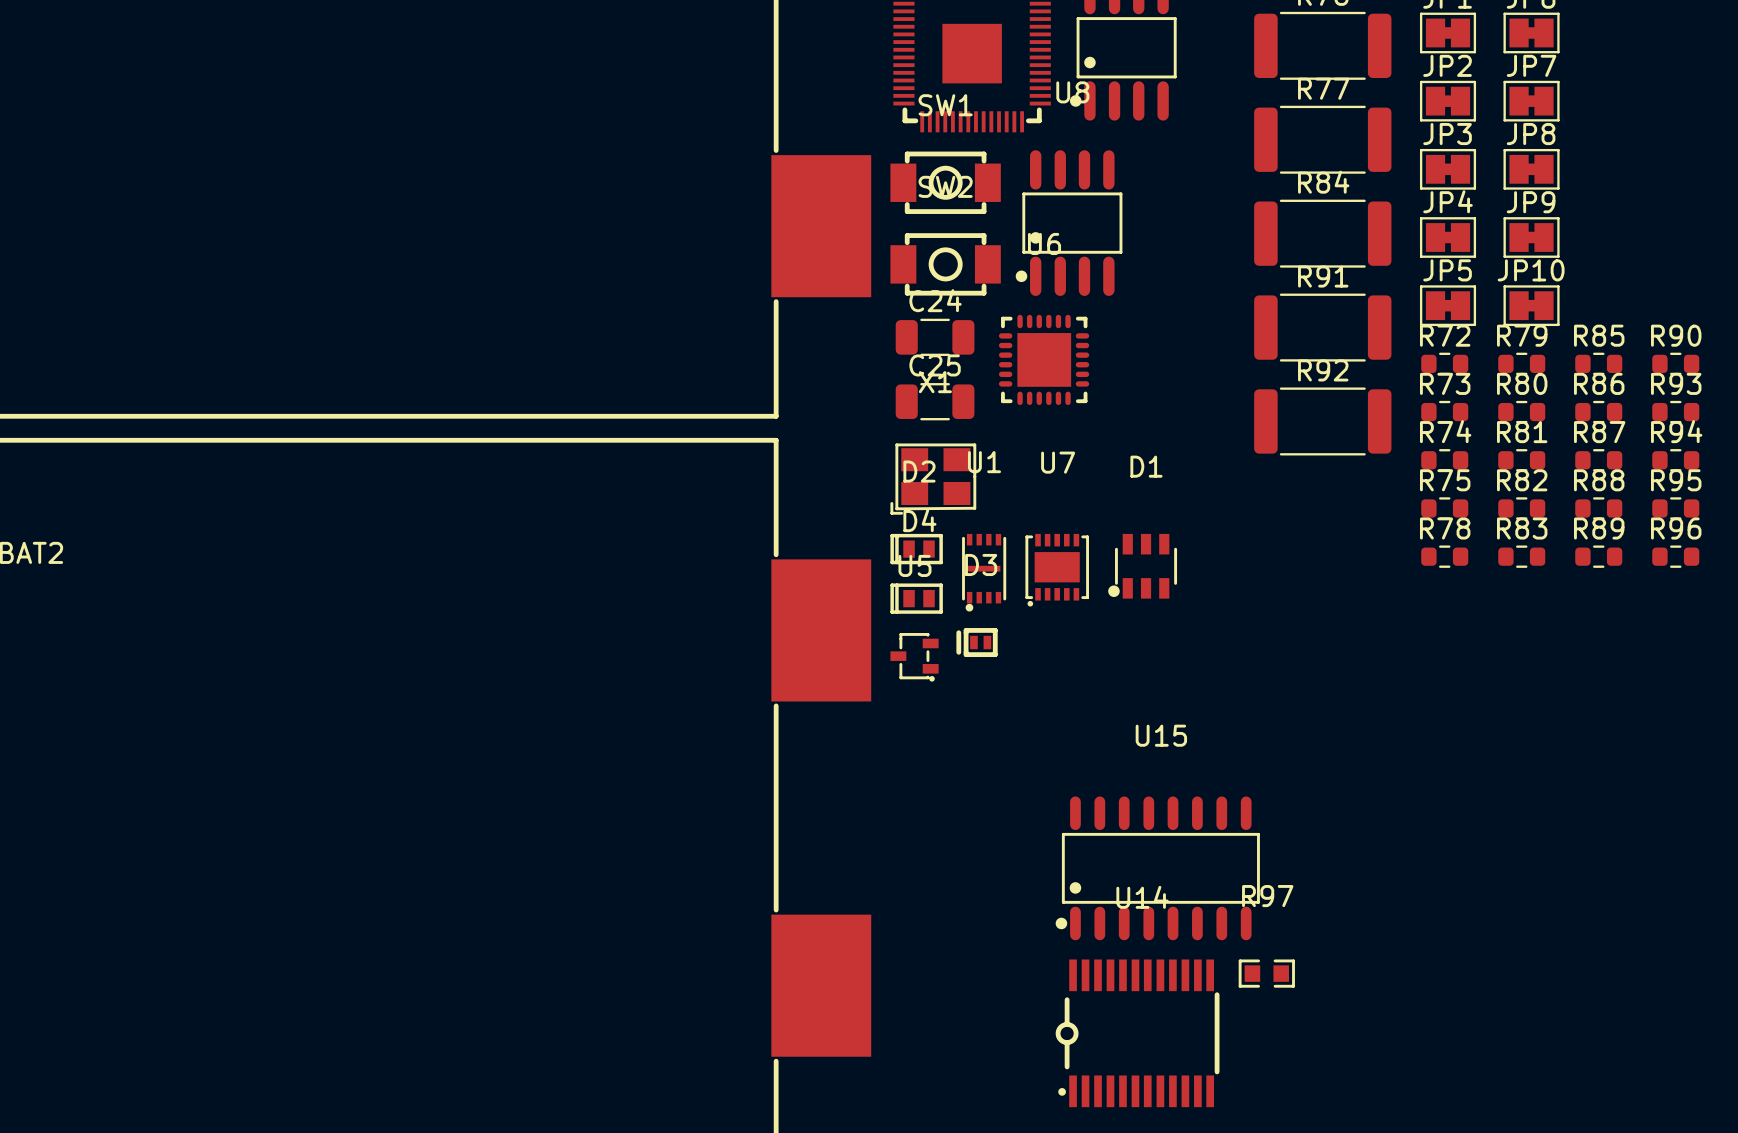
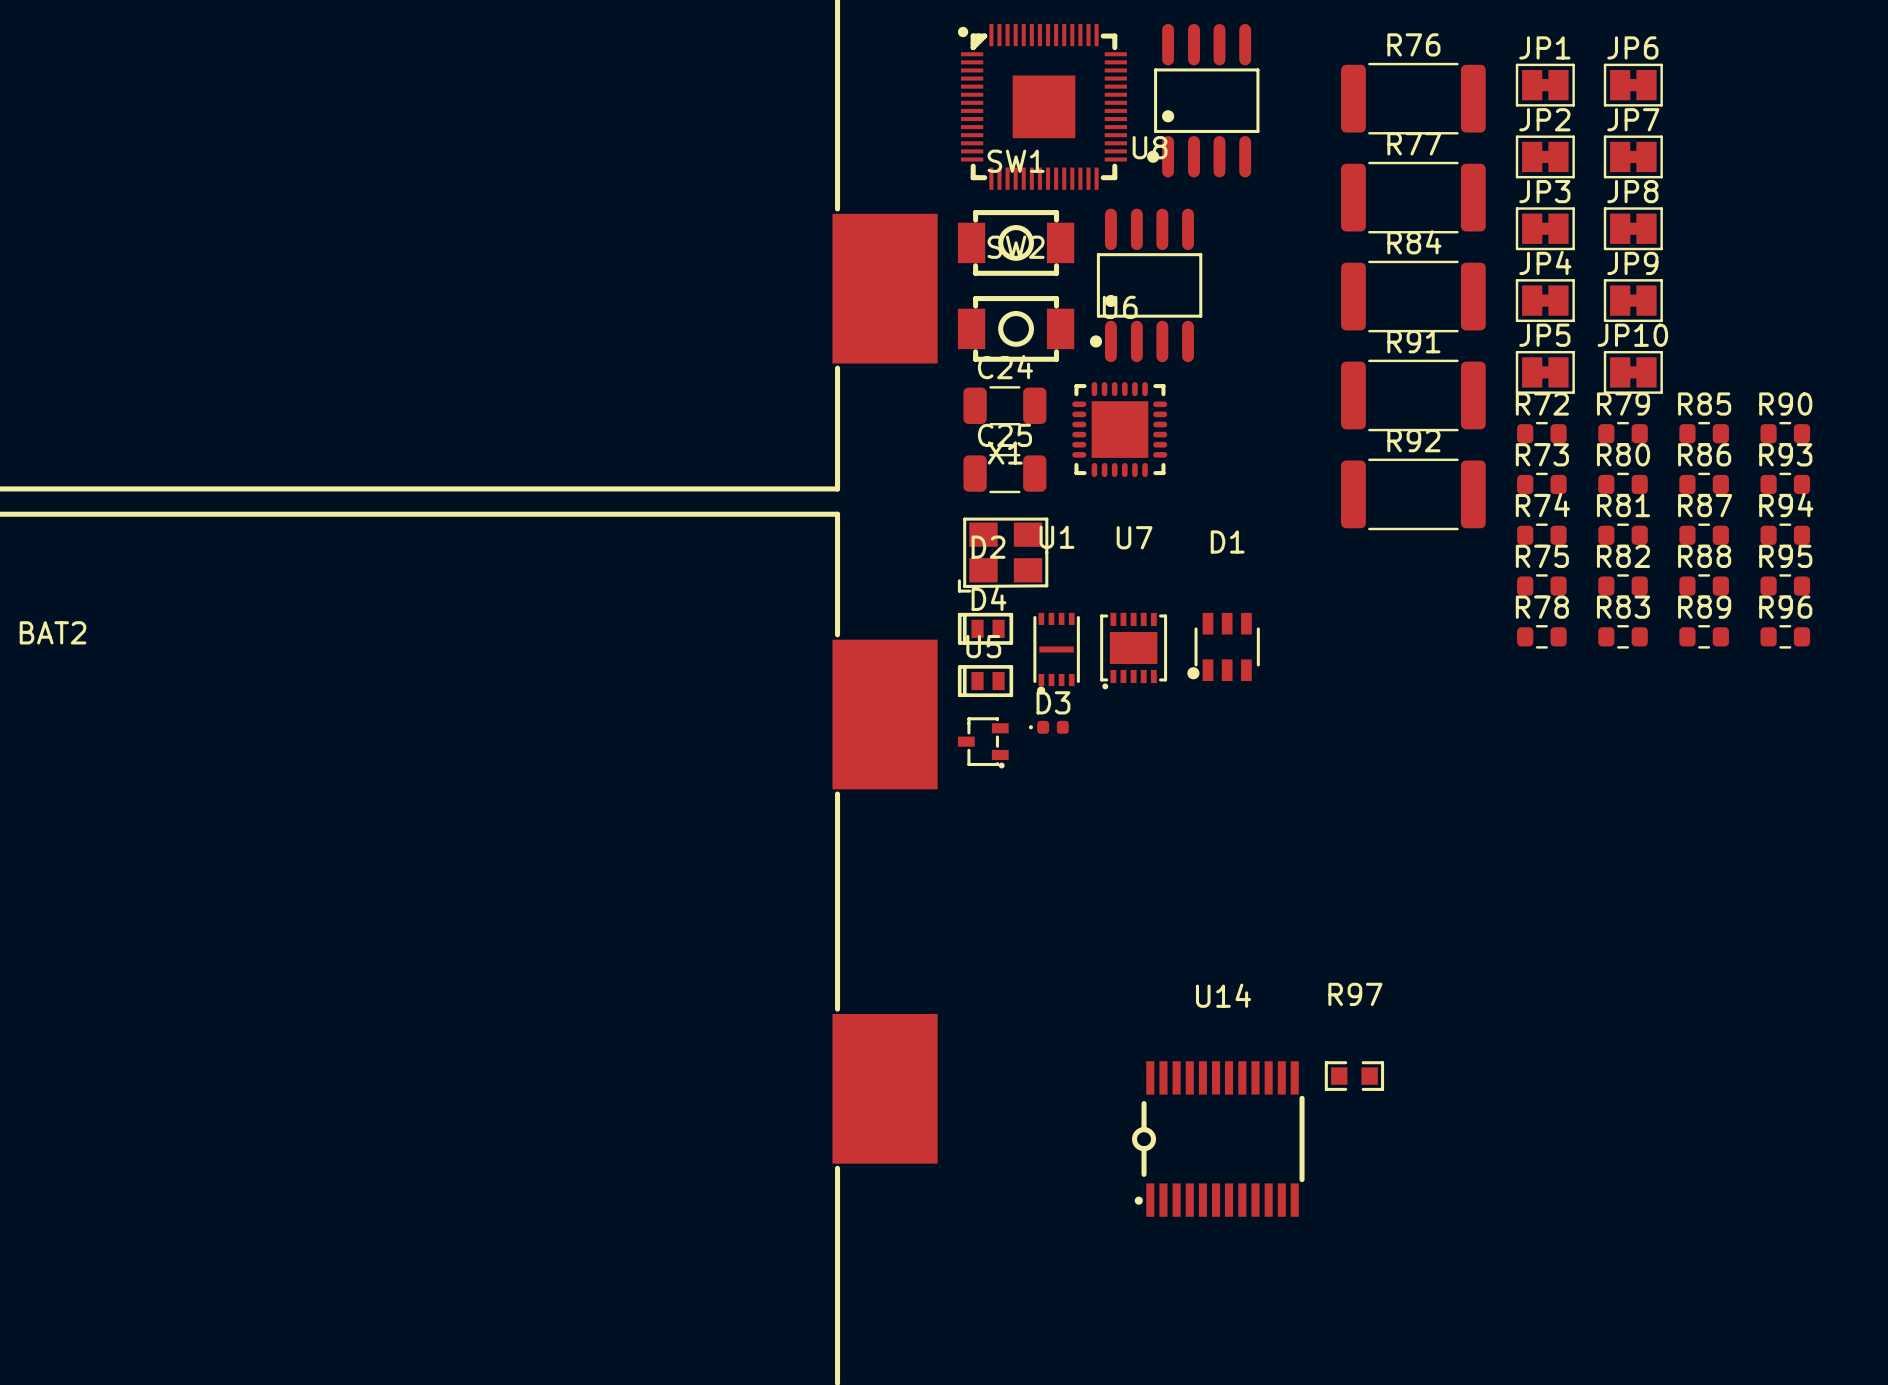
D3 name position: D3 (981, 564) -> D3 (1053, 702)
D3 footprint: [956, 628, 998, 658] -> [1028, 720, 1069, 734]
U15: (1157, 868) -> none

